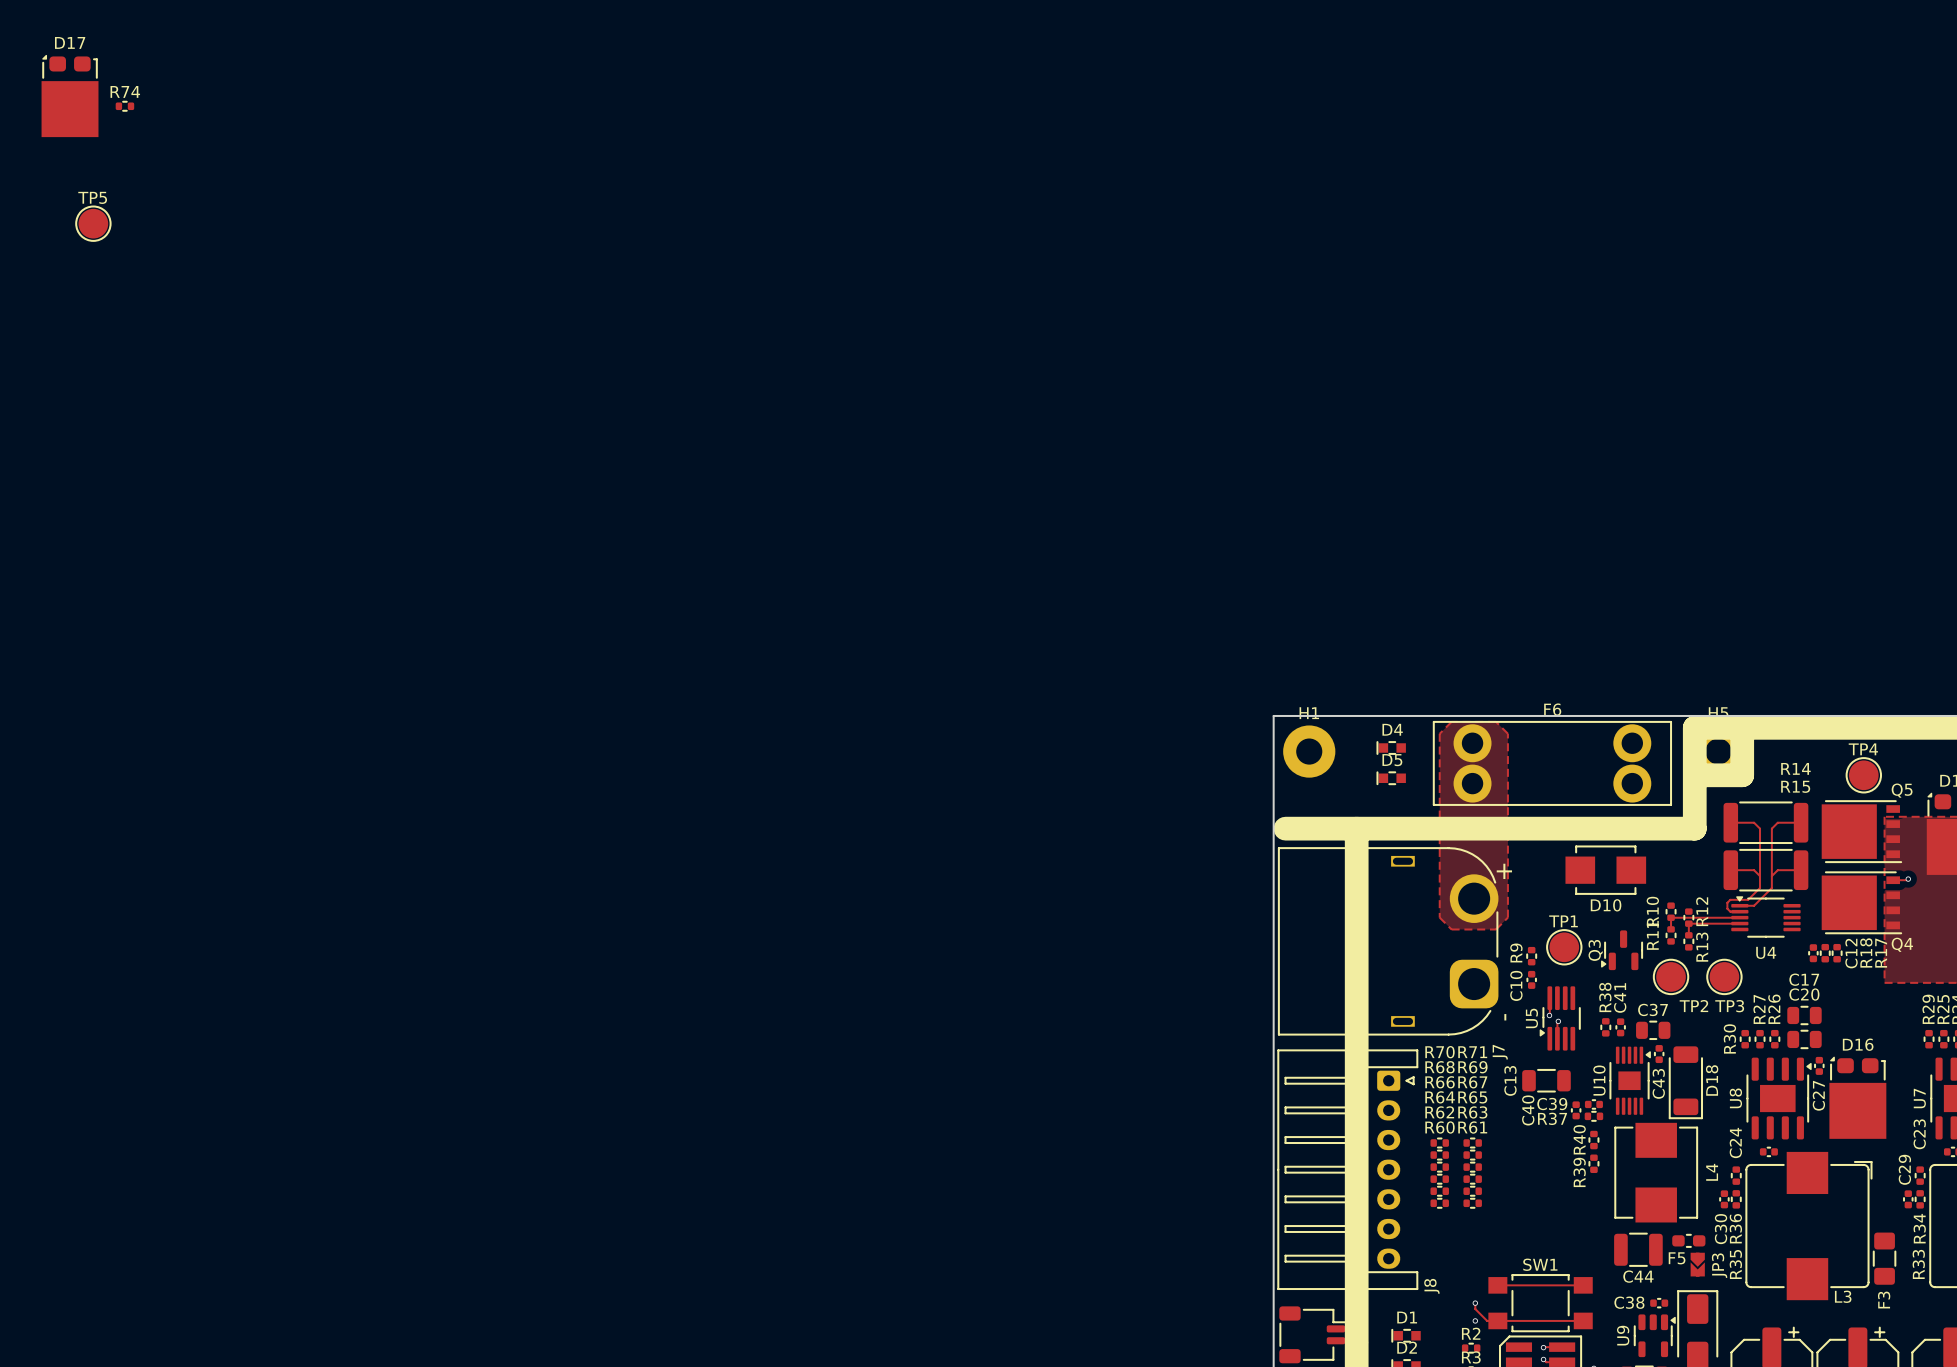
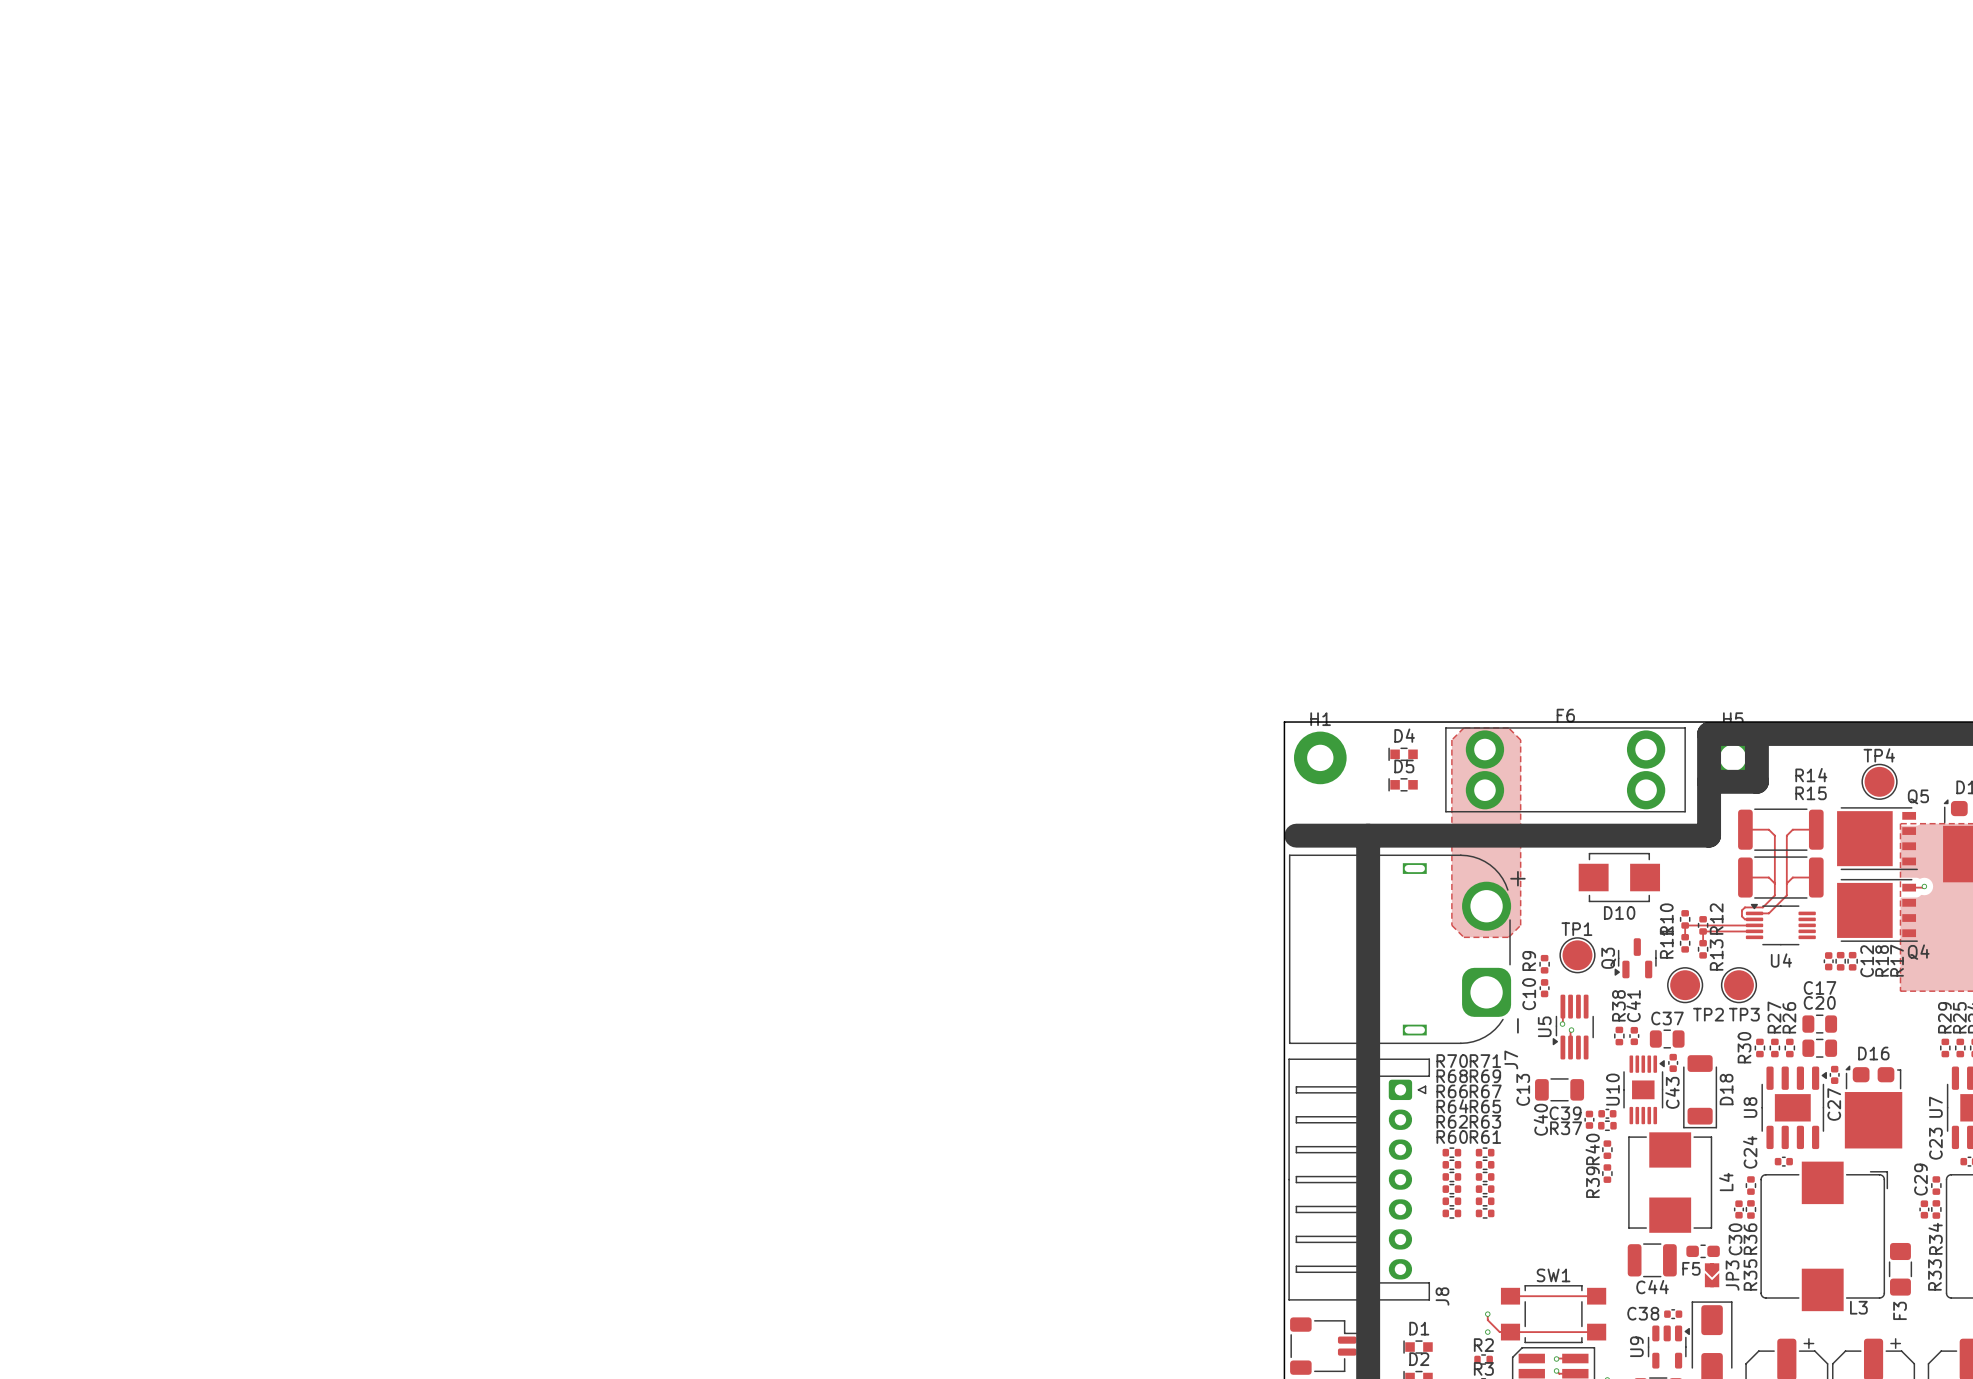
D17: (70, 96) -> none
R74: (124, 106) -> none
TP5: (93, 223) -> none

